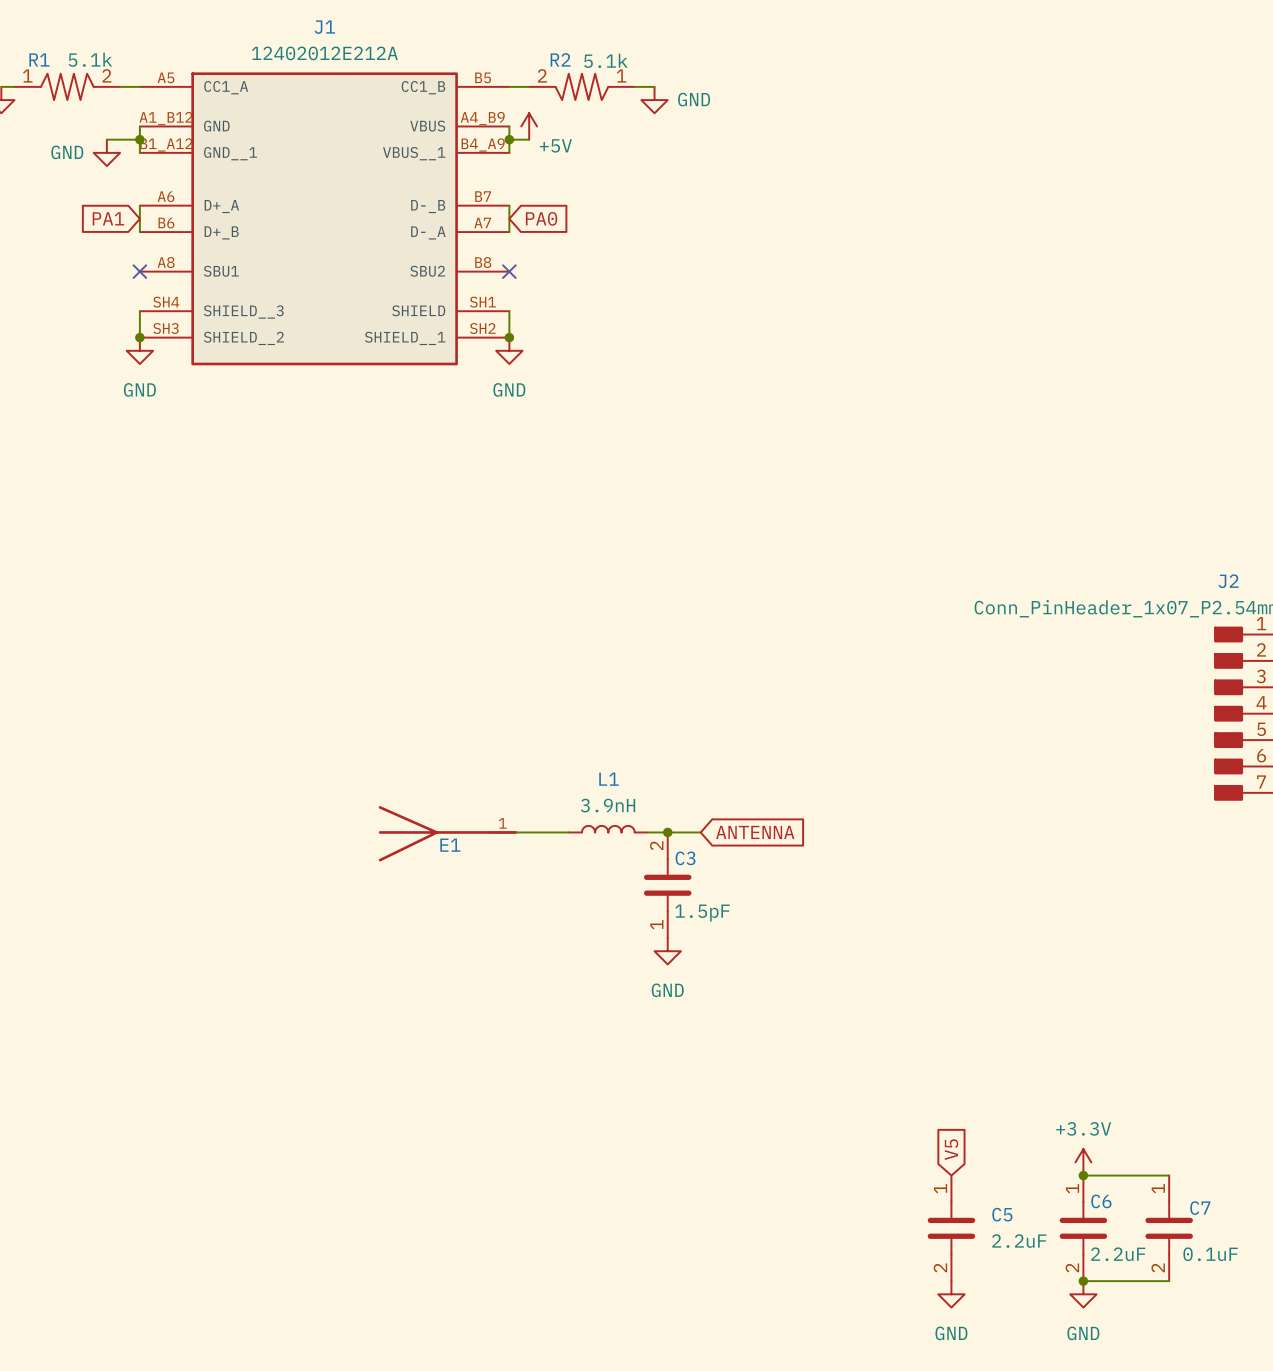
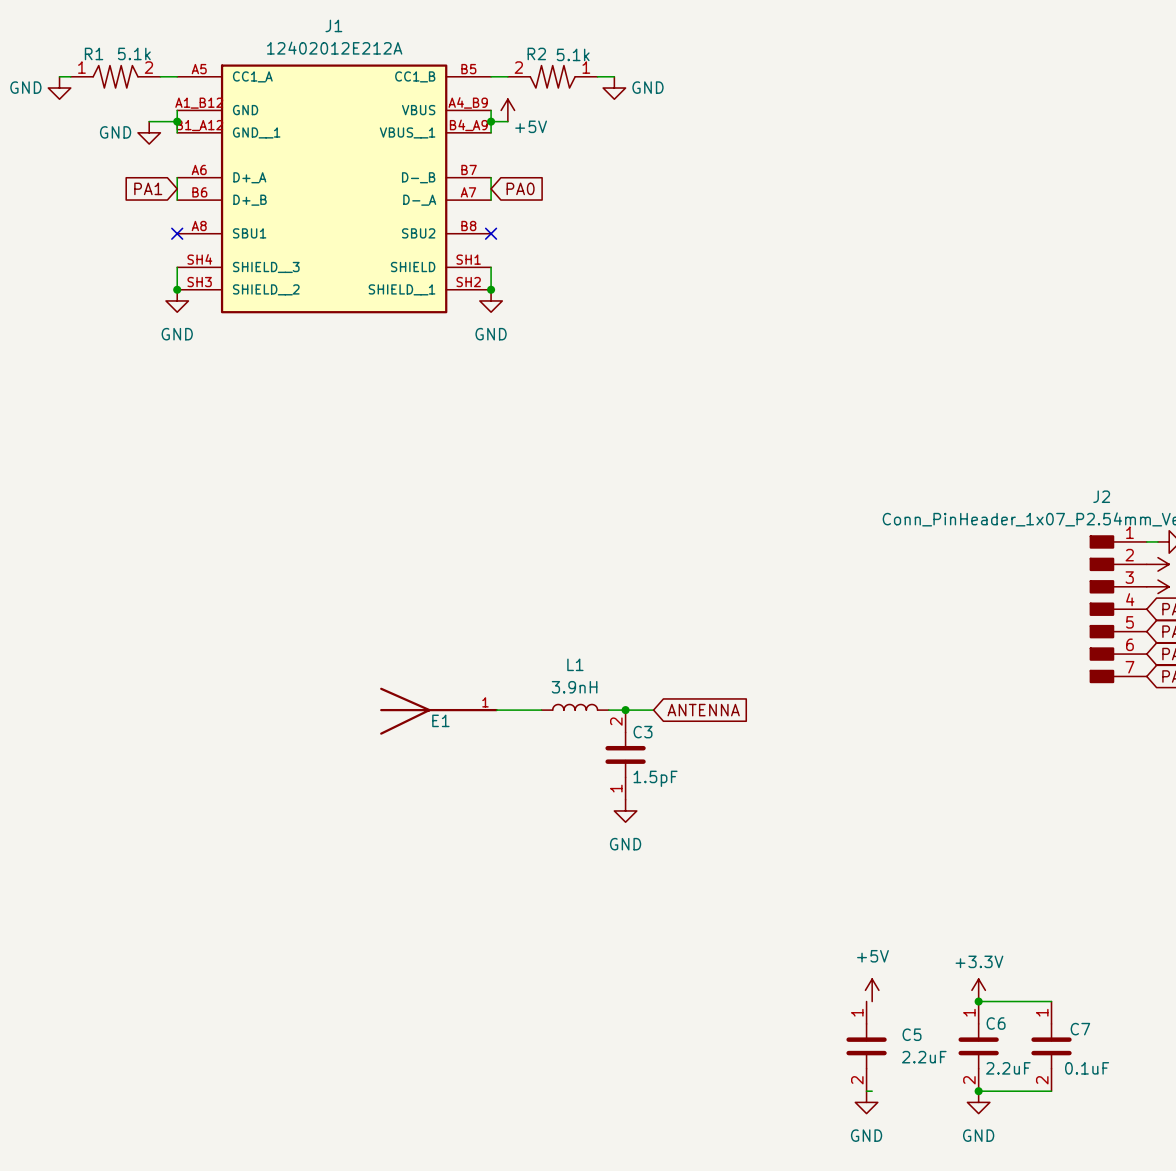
global label: V5 (951, 1149) -> none
power symbol: none -> +5V (872, 990)
wire: none -> (866, 1091) (872, 1091)

